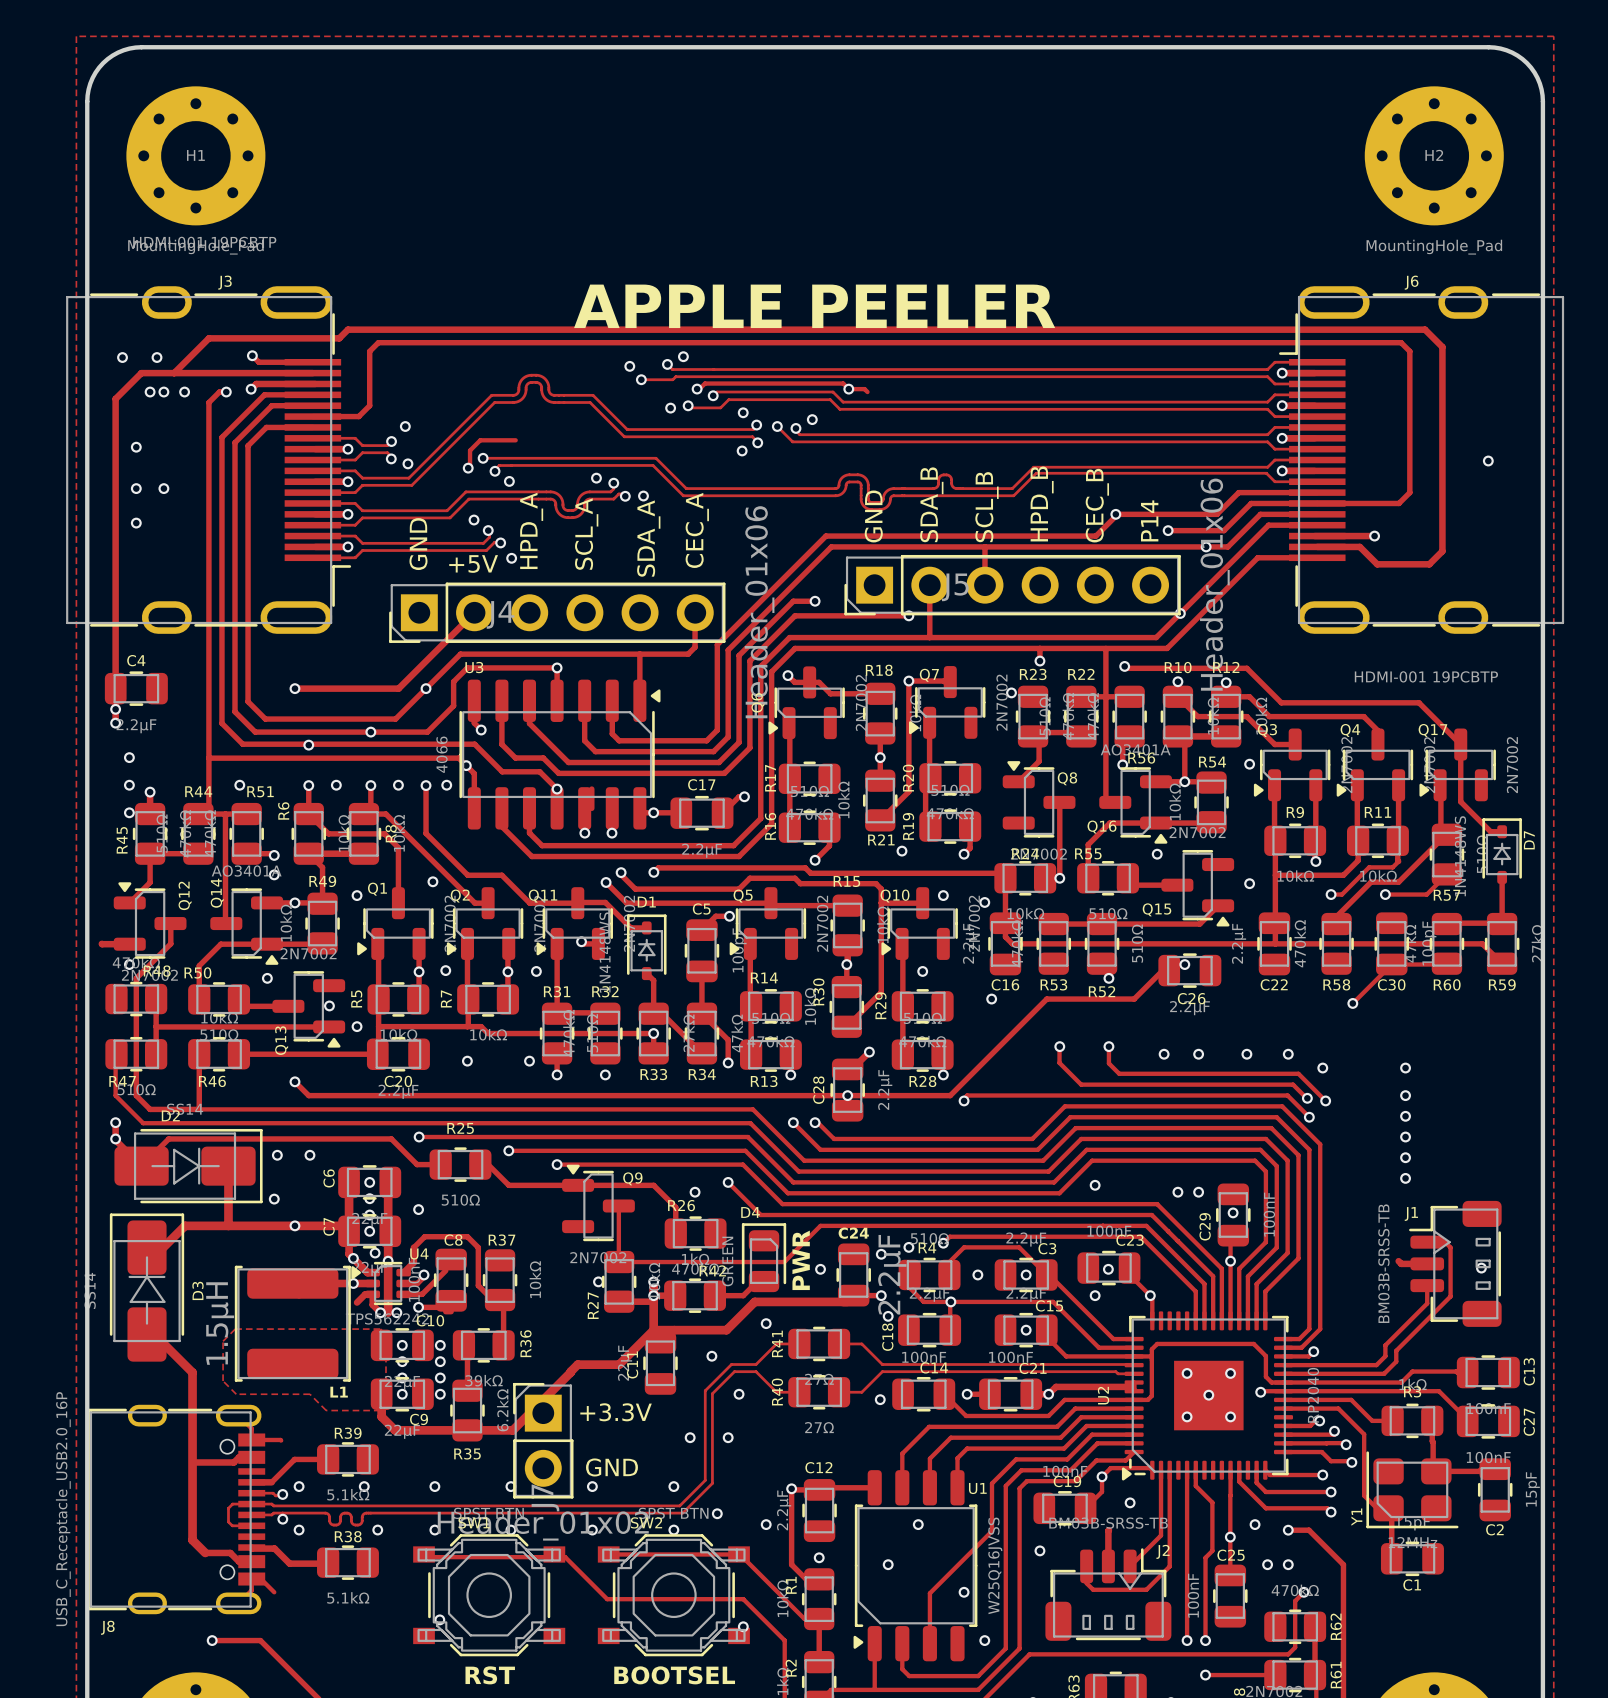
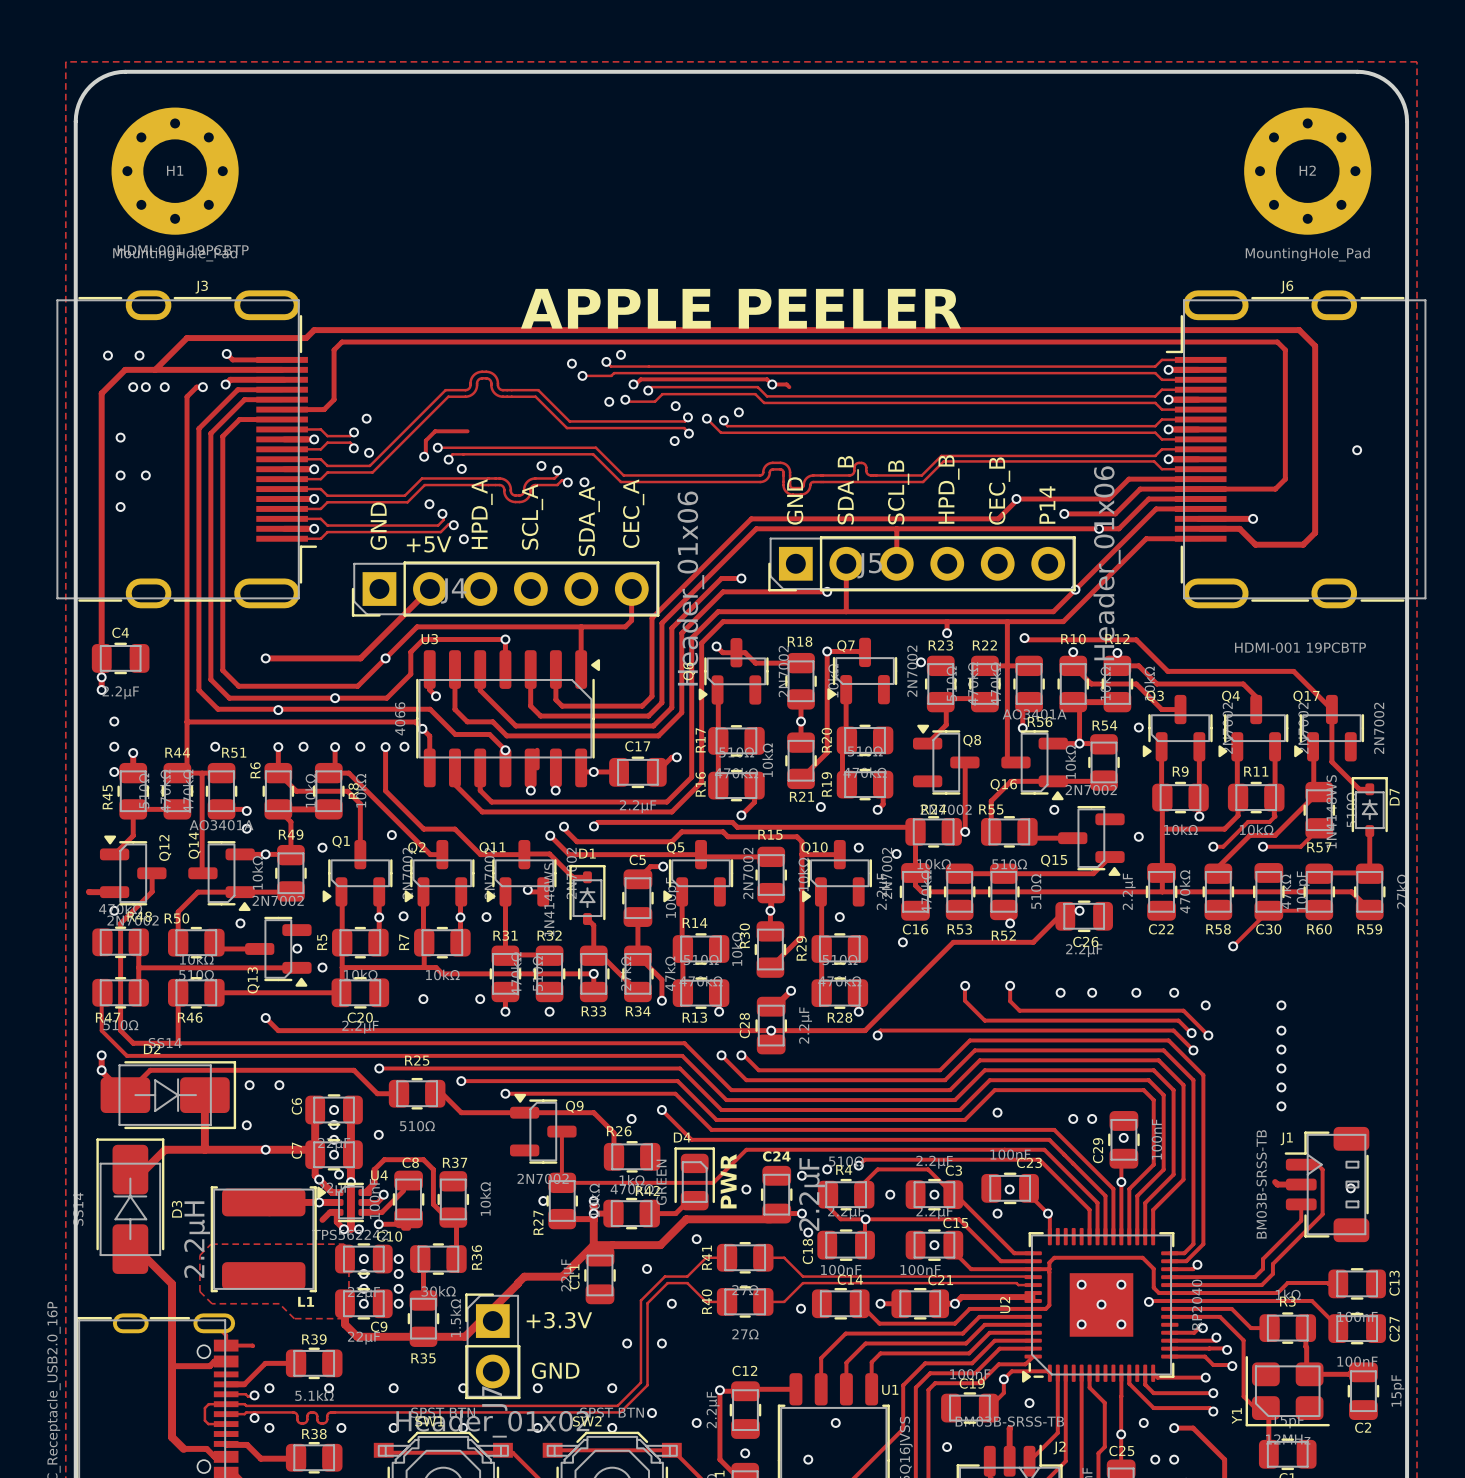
L1 value: 1.5μH (220, 1323) -> 2.2μH (197, 1239)
R36 value: 39kΩ (484, 1380) -> 30kΩ (438, 1291)
R35 value: 6.2kΩ (502, 1410) -> 1.5kΩ (455, 1318)

